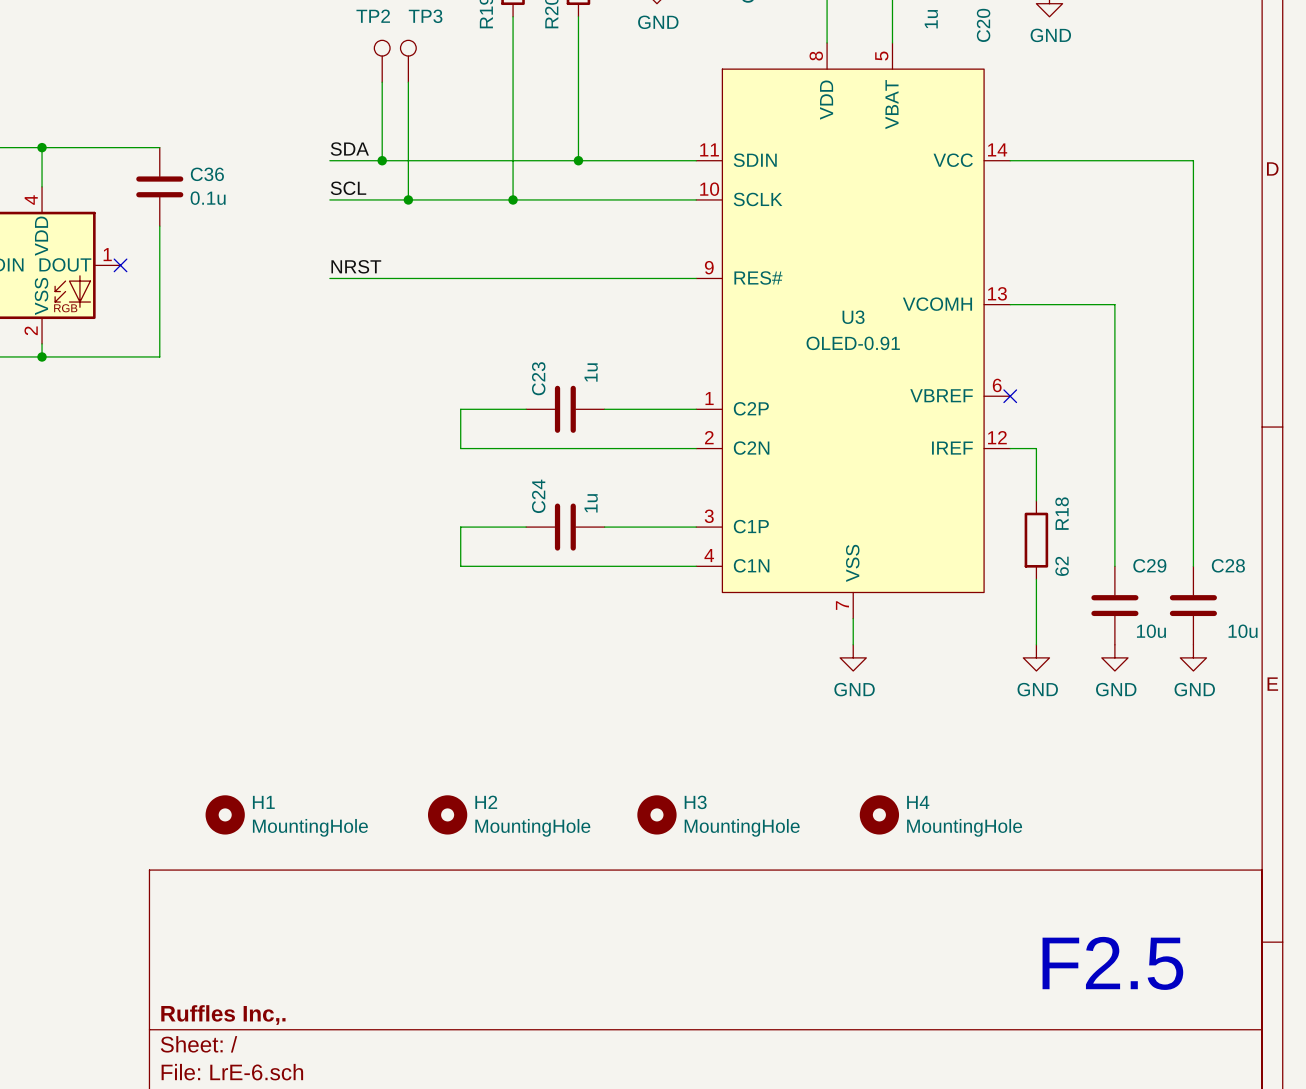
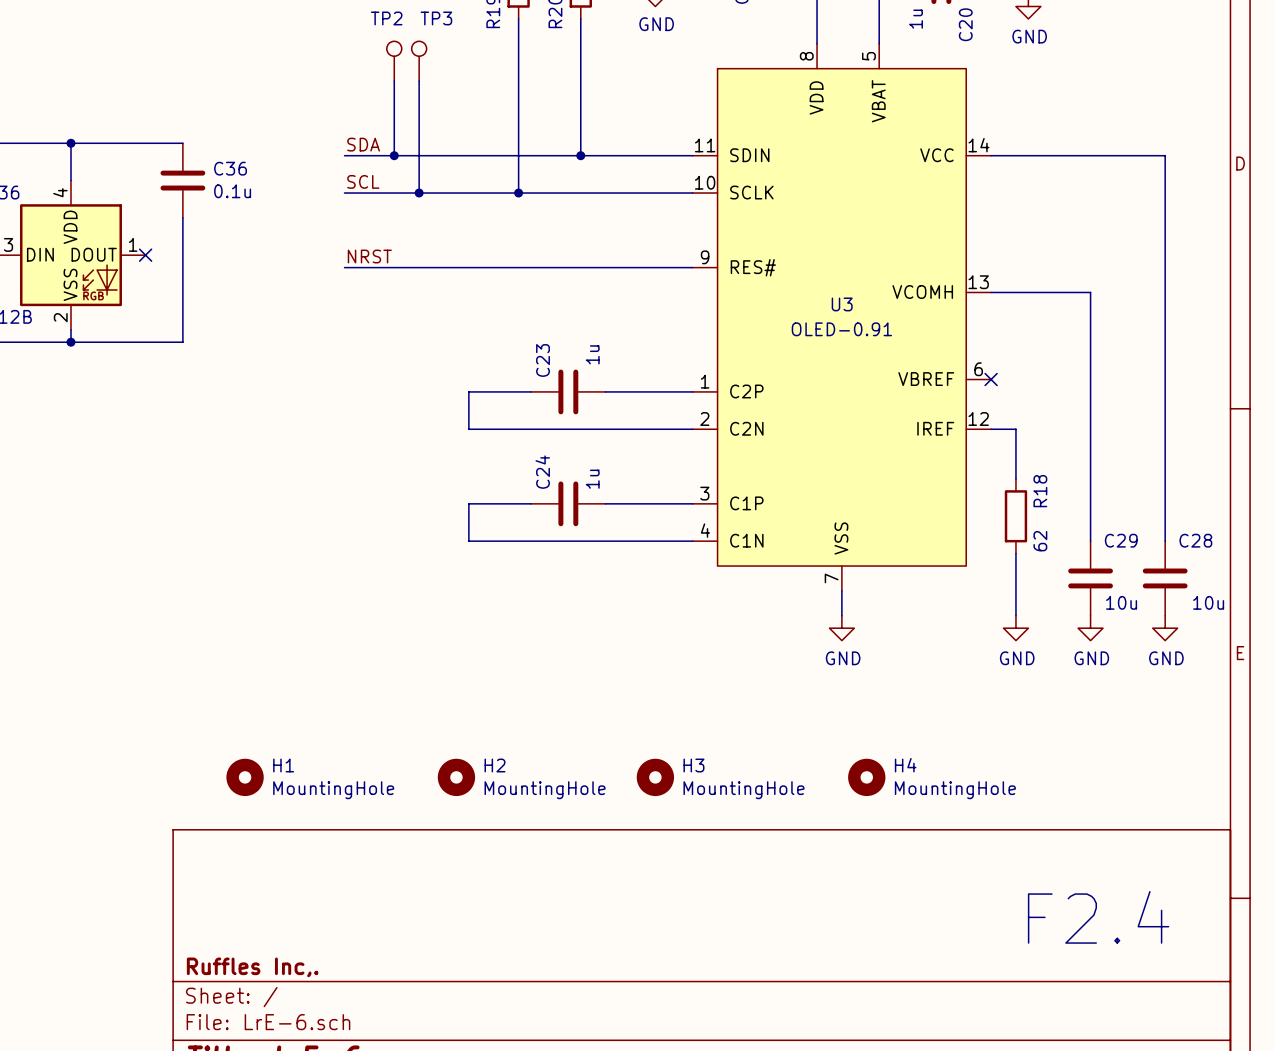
text: F2.5 (1112, 963) -> F2.4 (1098, 917)

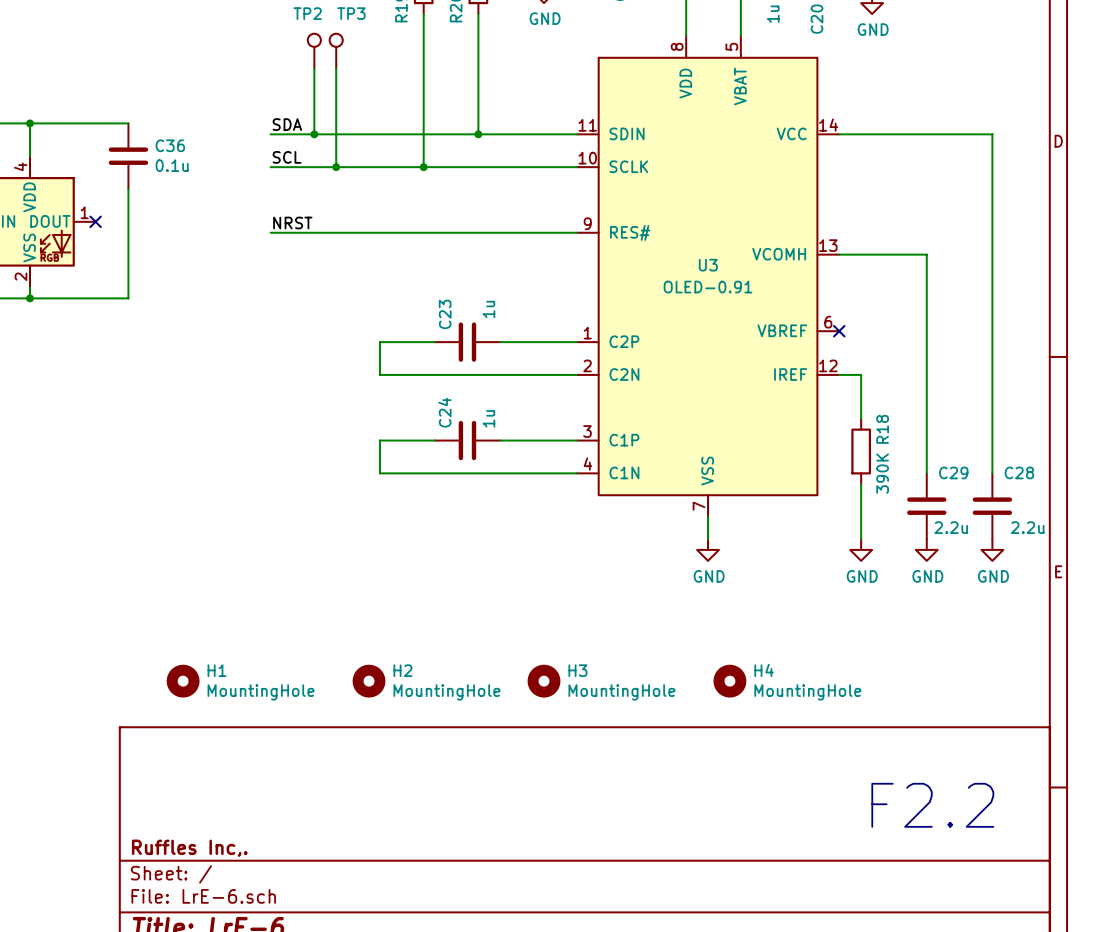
R18 value: 62 (1040, 541) -> 390K (882, 473)
C29 value: 10u (1121, 602) -> 2.2u (951, 527)
C28 value: 10u (1208, 602) -> 2.2u (1027, 527)
text: F2.4 (1098, 917) -> F2.2 (932, 805)

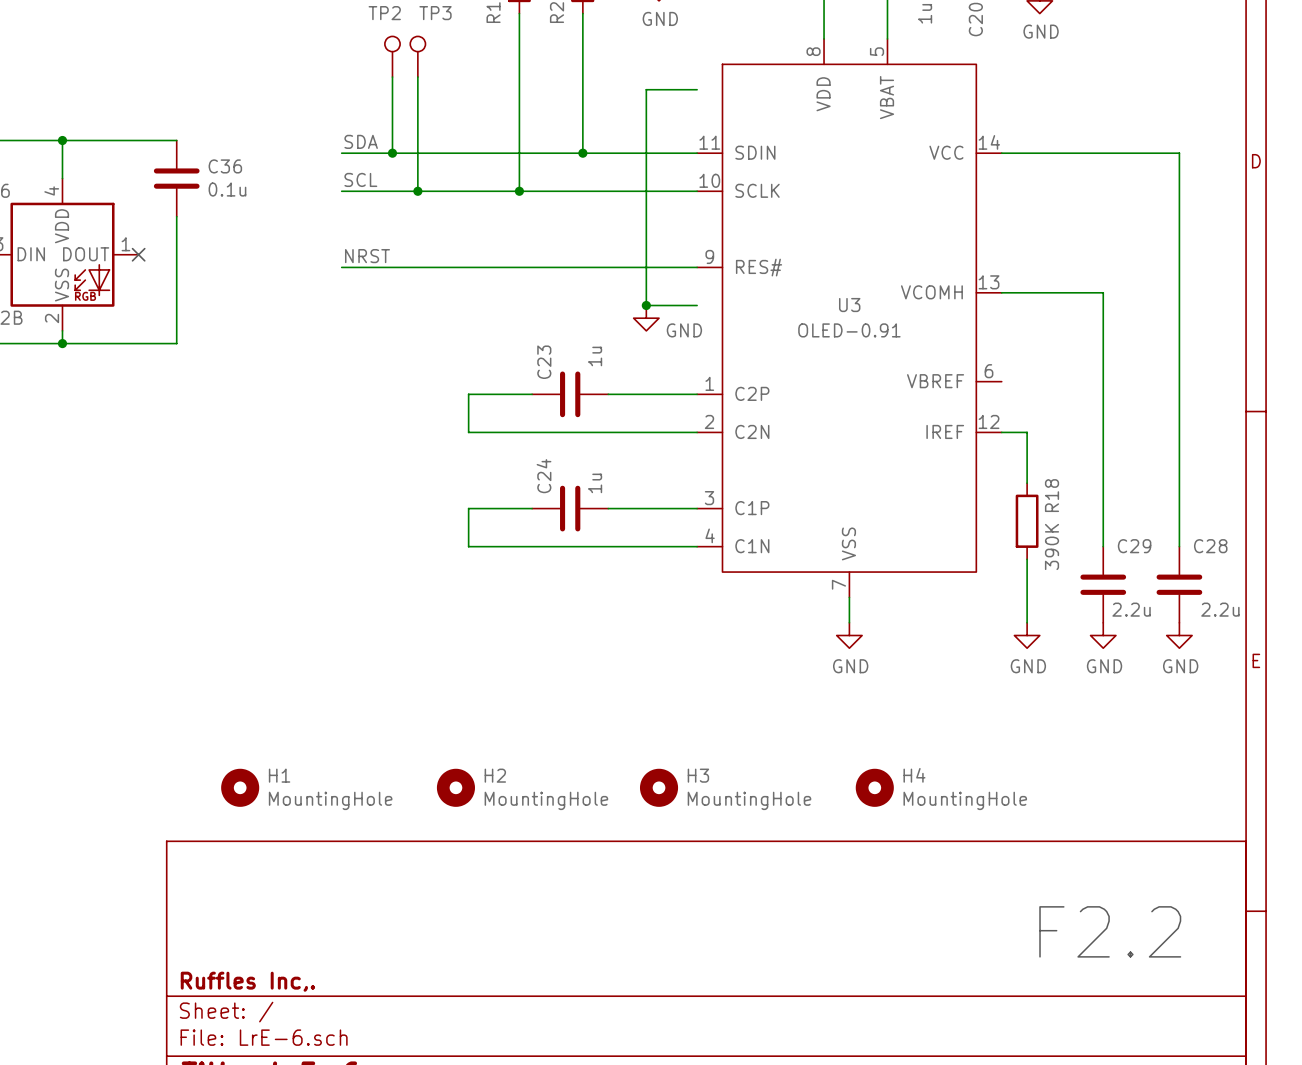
wire: none -> (697, 89) (646, 89) (646, 305) (697, 305)
junction: none -> (646, 305)
power symbol: none -> GND (646, 318)
no-connect mark: (839, 331) -> none

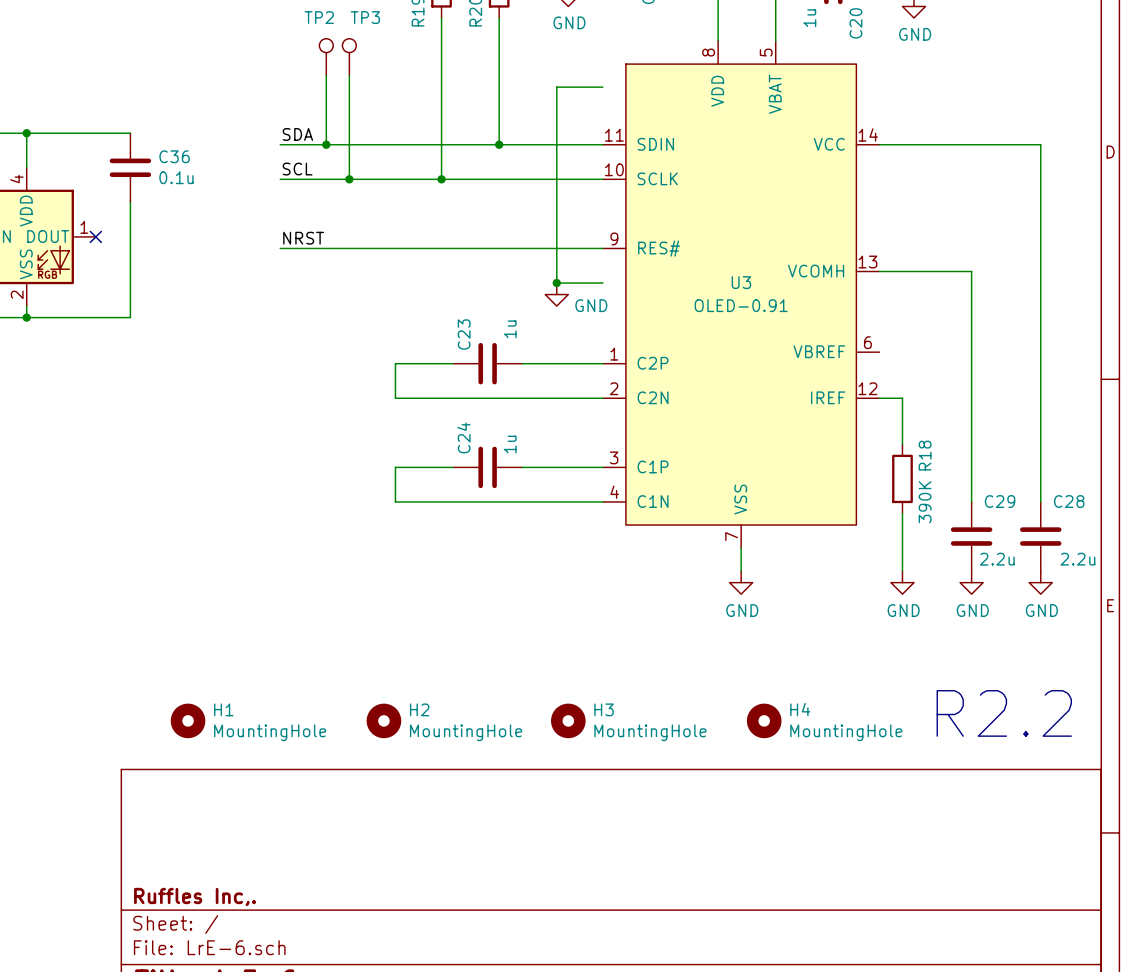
text: none -> R2.2 (1004, 713)
text: F2.2 (1110, 931) -> none

